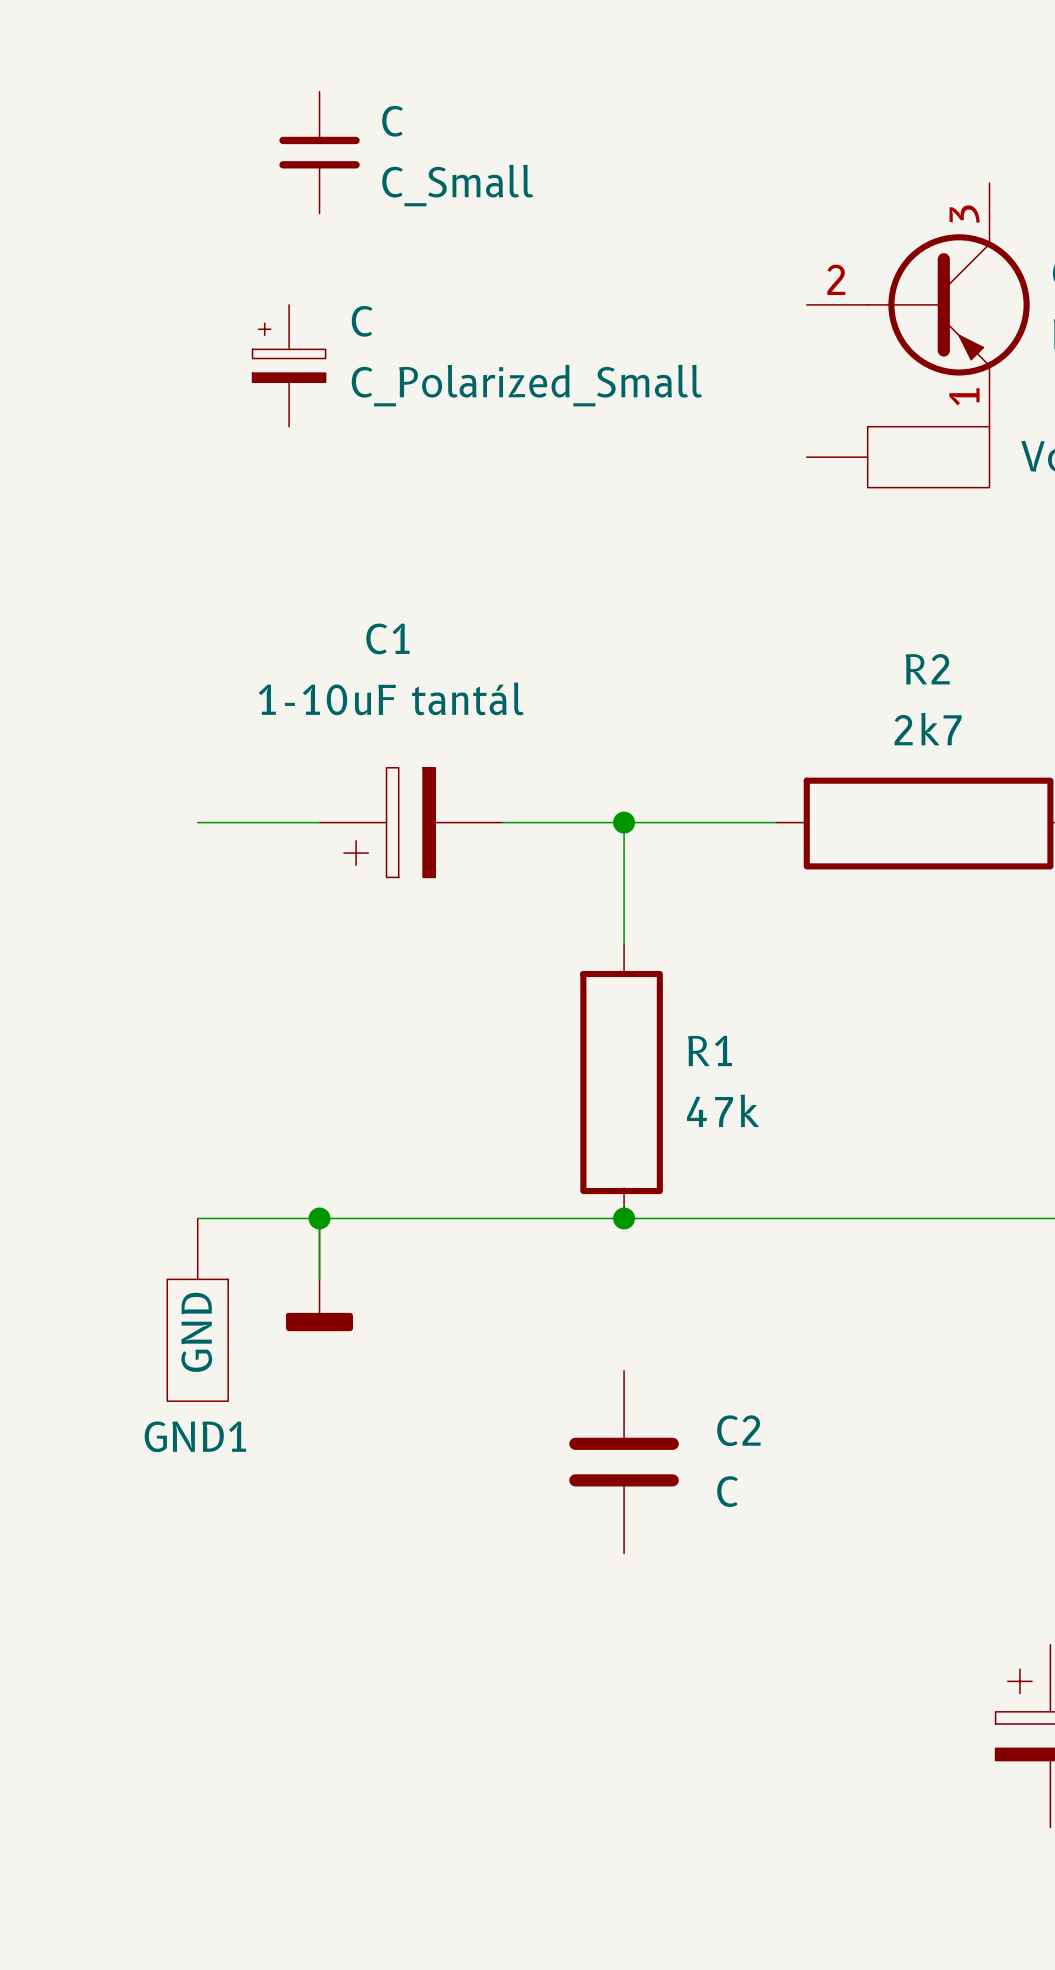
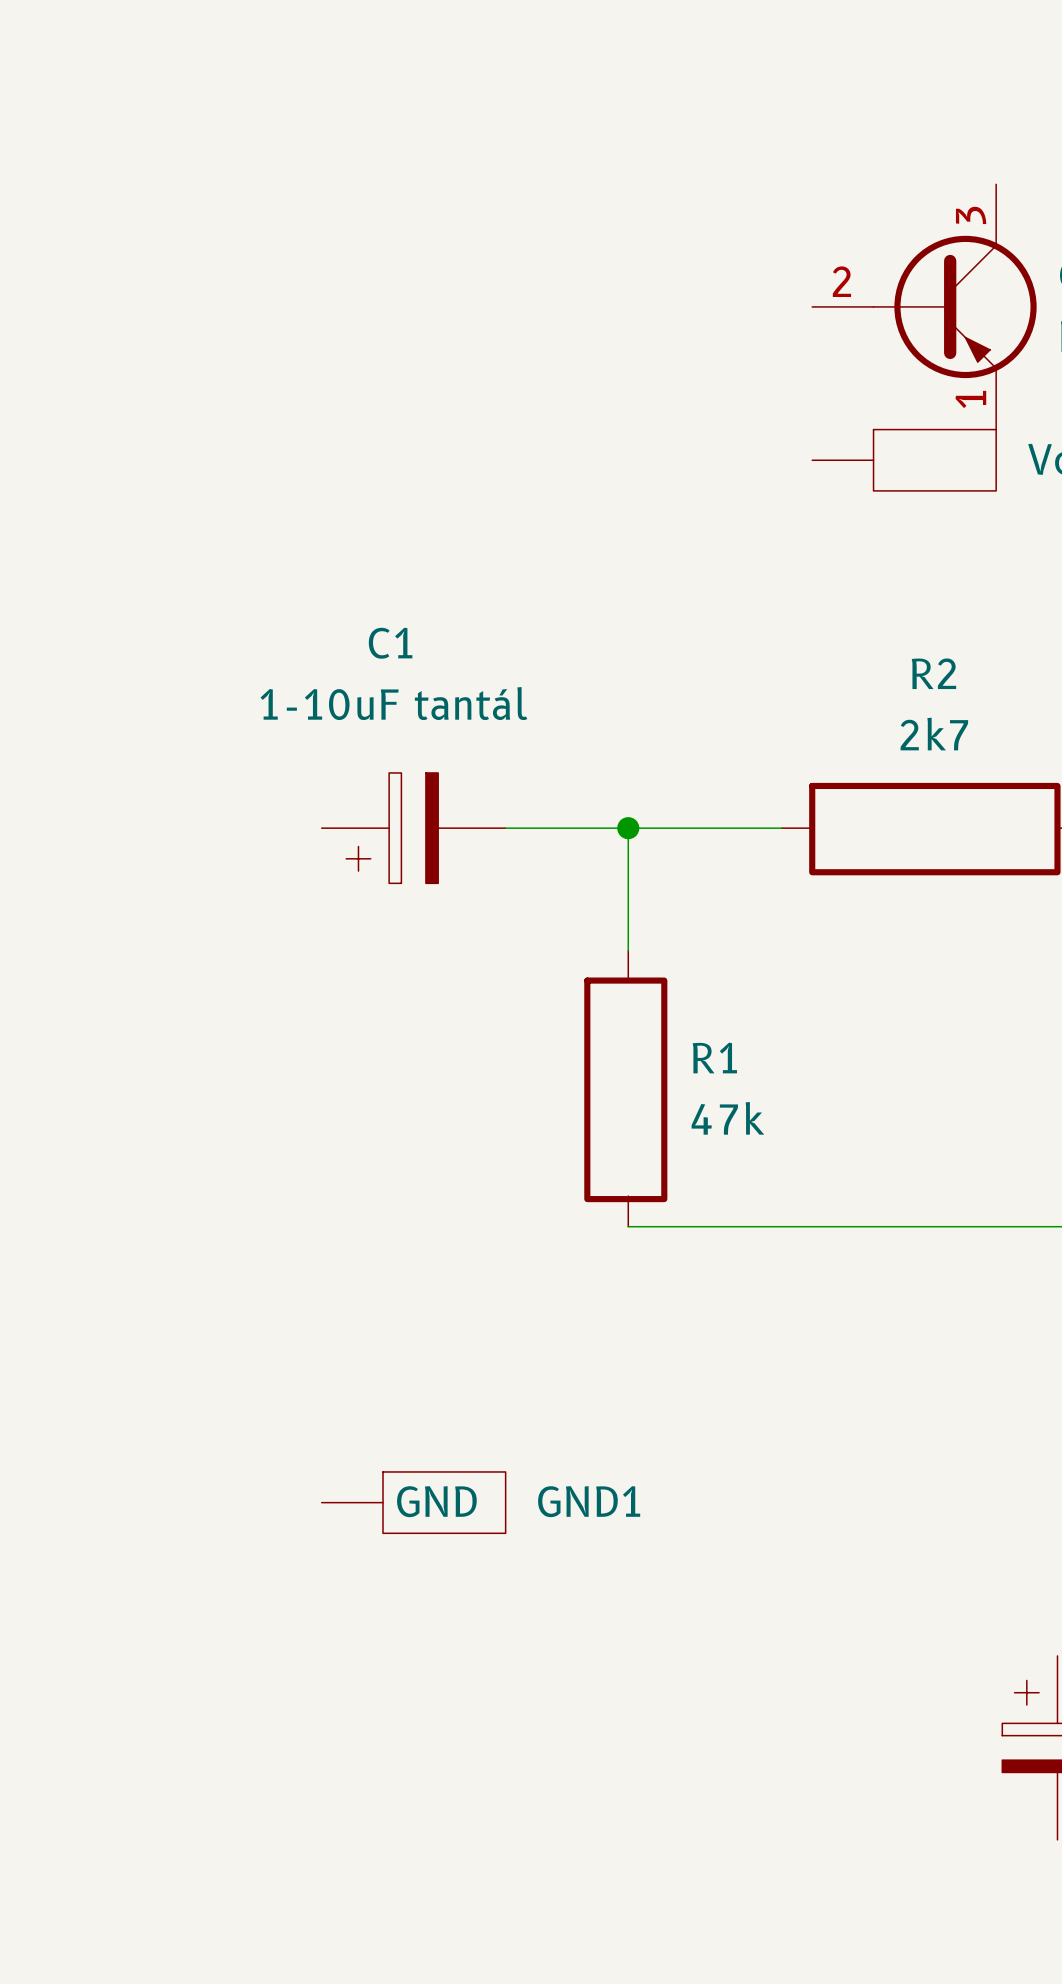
C: C_Small (319, 152) -> none
C: C_Polarized_Small (289, 365) -> none
wire: (197, 822) (319, 822) -> none
wire: (197, 1218) (624, 1218) -> none
wire: (319, 1218) (319, 1279) -> none
junction: (319, 1218) -> none
junction: (624, 1218) -> none
power symbol: (319, 1274) -> none
GND1 position: (197, 1309) -> (413, 1502)
GND1 rotation: 0° (197, 1340) -> 90° counterclockwise (444, 1502)
GND1 name position: GND1 (195, 1436) -> GND1 (589, 1501)
C2: C (624, 1462) -> none

